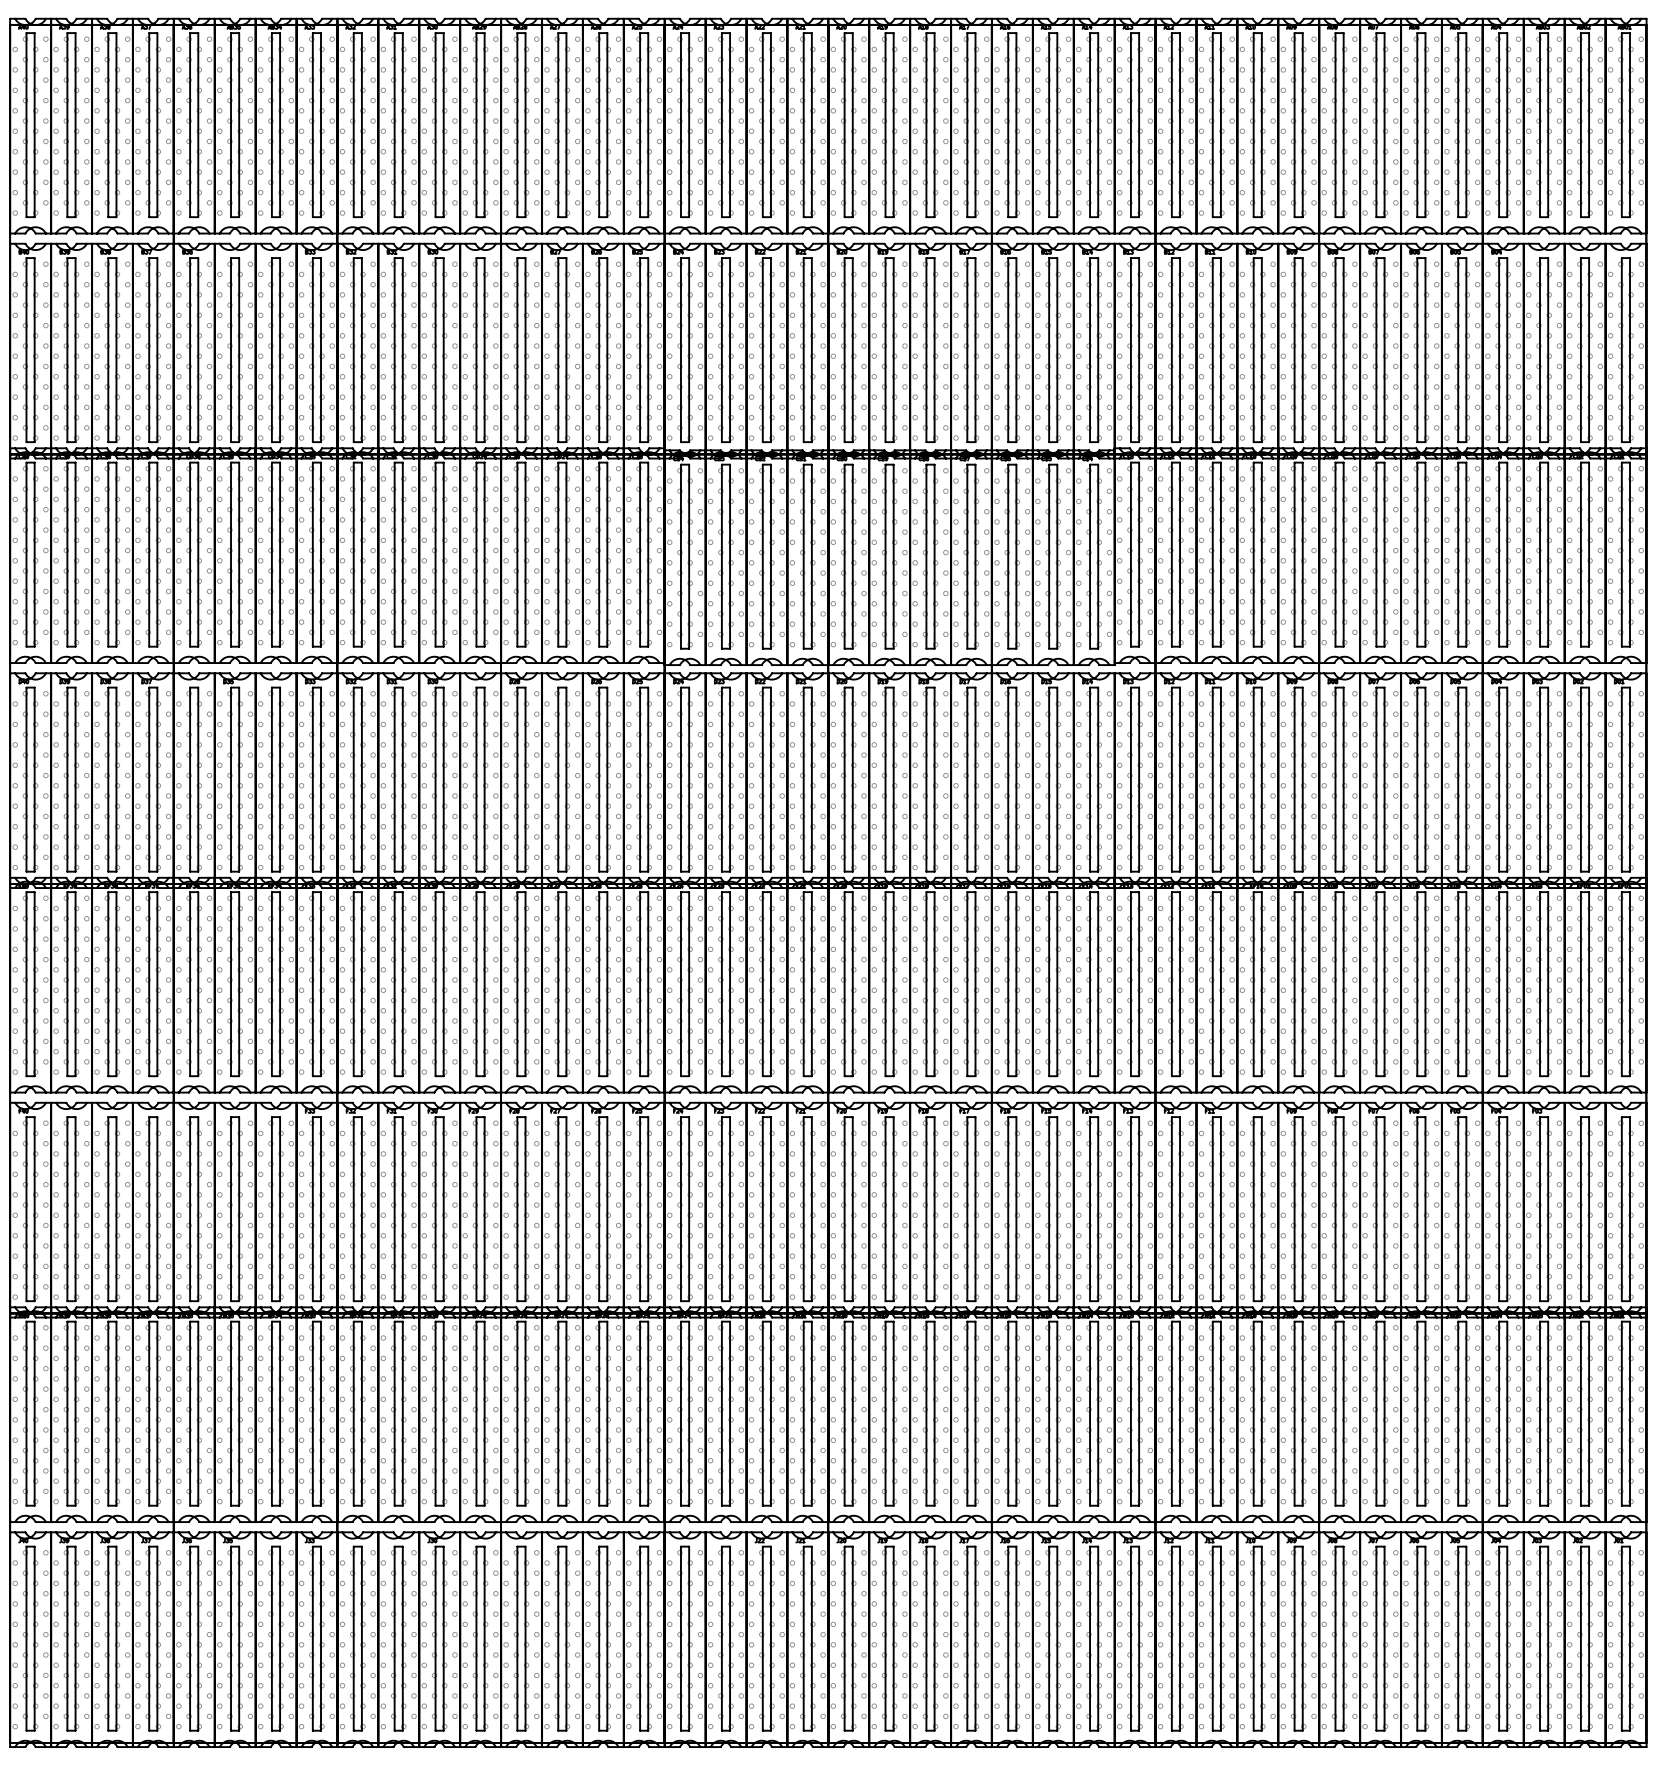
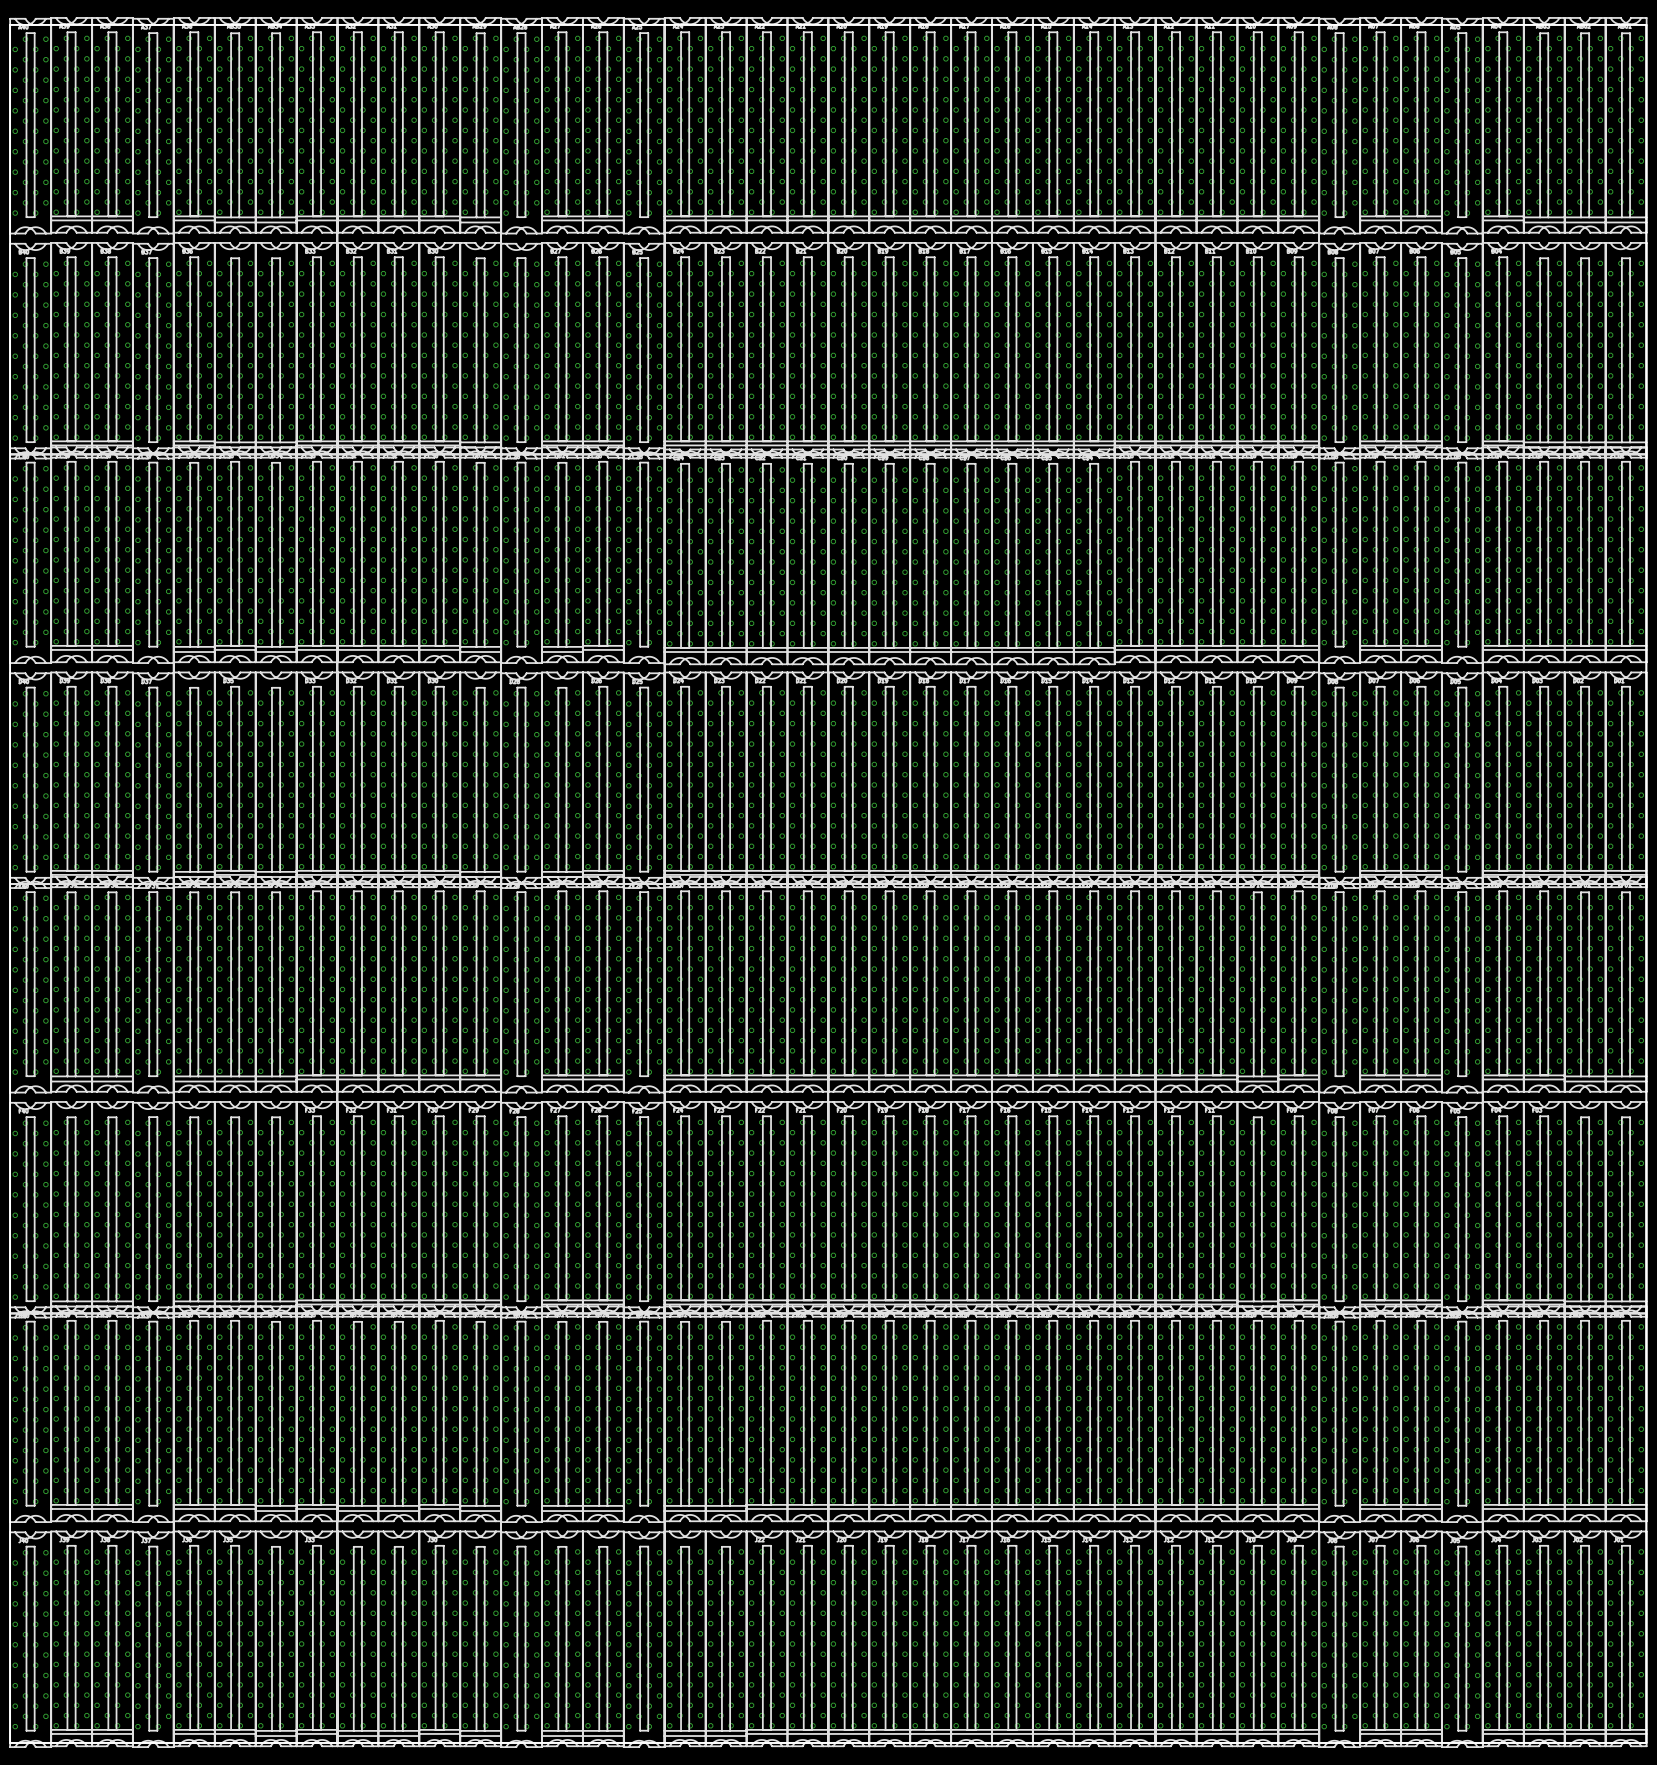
part footprint: [50, 18, 93, 234] -> [50, 17, 93, 233]
part footprint: [91, 18, 134, 234] -> [91, 17, 134, 233]
part footprint: [173, 18, 216, 234] -> [173, 17, 216, 233]
part footprint: [214, 18, 256, 459] -> [214, 17, 257, 458]
part footprint: [255, 18, 297, 459] -> [255, 17, 298, 458]
part footprint: [296, 18, 338, 234] -> [296, 17, 338, 233]
part footprint: [337, 18, 379, 234] -> [336, 17, 379, 233]
part footprint: [378, 18, 420, 234] -> [377, 17, 420, 233]
part footprint: [418, 18, 461, 234] -> [418, 17, 461, 233]
part footprint: [459, 18, 502, 459] -> [459, 17, 502, 458]
part footprint: [541, 18, 584, 234] -> [541, 17, 584, 233]
part footprint: [582, 18, 625, 234] -> [582, 17, 625, 233]
part footprint: [664, 18, 706, 234] -> [664, 17, 707, 233]
part footprint: [705, 18, 747, 234] -> [705, 17, 747, 233]
part footprint: [746, 18, 788, 234] -> [745, 17, 788, 233]
part footprint: [787, 18, 829, 234] -> [786, 17, 829, 233]
part footprint: [828, 18, 870, 234] -> [827, 17, 870, 233]
part footprint: [868, 18, 911, 234] -> [868, 17, 911, 233]
part footprint: [909, 18, 952, 234] -> [909, 17, 952, 233]
part footprint: [950, 18, 993, 234] -> [950, 17, 993, 233]
part footprint: [991, 18, 1034, 234] -> [991, 17, 1034, 233]
part footprint: [1032, 18, 1075, 234] -> [1032, 17, 1075, 233]
part footprint: [1073, 18, 1115, 234] -> [1073, 17, 1116, 233]
part footprint: [1114, 18, 1156, 234] -> [1114, 17, 1157, 233]
part footprint: [1155, 18, 1197, 234] -> [1155, 17, 1197, 233]
part footprint: [1196, 18, 1238, 234] -> [1195, 17, 1238, 233]
part footprint: [1237, 18, 1279, 234] -> [1236, 17, 1279, 233]
part footprint: [1278, 18, 1320, 234] -> [1277, 17, 1320, 233]
part footprint: [1359, 18, 1402, 234] -> [1359, 17, 1402, 233]
part footprint: [1400, 18, 1443, 234] -> [1400, 17, 1443, 233]
part footprint: [1482, 18, 1525, 234] -> [1482, 17, 1525, 233]
part footprint: [1523, 18, 1565, 459] -> [1523, 17, 1566, 458]
part footprint: [1564, 18, 1606, 459] -> [1564, 17, 1607, 458]
part footprint: [1605, 18, 1647, 459] -> [1605, 17, 1647, 458]
part footprint: [50, 243, 93, 459] -> [50, 242, 93, 458]
part footprint: [91, 243, 134, 459] -> [91, 242, 134, 458]
part footprint: [173, 243, 216, 459] -> [173, 242, 216, 458]
part footprint: [296, 243, 338, 459] -> [296, 242, 338, 458]
part footprint: [337, 243, 379, 459] -> [336, 242, 379, 458]
part footprint: [378, 243, 420, 459] -> [377, 242, 420, 458]
part footprint: [418, 243, 461, 459] -> [418, 242, 461, 458]
part footprint: [541, 243, 584, 459] -> [541, 242, 584, 458]
part footprint: [582, 243, 625, 459] -> [582, 242, 625, 458]
part footprint: [664, 243, 706, 459] -> [664, 242, 707, 458]
part footprint: [705, 243, 747, 459] -> [705, 242, 747, 458]
part footprint: [746, 243, 788, 459] -> [745, 242, 788, 458]
part footprint: [787, 243, 829, 459] -> [786, 242, 829, 458]
part footprint: [828, 243, 870, 459] -> [827, 242, 870, 458]
part footprint: [868, 243, 911, 459] -> [868, 242, 911, 458]
part footprint: [909, 243, 952, 459] -> [909, 242, 952, 458]
part footprint: [950, 243, 993, 459] -> [950, 242, 993, 458]
part footprint: [991, 243, 1034, 459] -> [991, 242, 1034, 458]
part footprint: [1032, 243, 1075, 459] -> [1032, 242, 1075, 458]
part footprint: [1073, 243, 1115, 459] -> [1073, 242, 1116, 458]
part footprint: [1114, 243, 1156, 459] -> [1114, 242, 1157, 458]
part footprint: [1155, 243, 1197, 459] -> [1155, 242, 1197, 458]
part footprint: [1196, 243, 1238, 459] -> [1195, 242, 1238, 458]
part footprint: [1237, 243, 1279, 459] -> [1236, 242, 1279, 458]
part footprint: [1278, 243, 1320, 459] -> [1277, 242, 1320, 458]
part footprint: [1359, 243, 1402, 459] -> [1359, 242, 1402, 458]
part footprint: [1400, 243, 1443, 459] -> [1400, 242, 1443, 458]
part footprint: [1482, 243, 1525, 459] -> [1482, 242, 1525, 458]
part footprint: [50, 448, 93, 664] -> [50, 447, 93, 663]
part footprint: [91, 448, 134, 664] -> [91, 447, 134, 663]
part footprint: [173, 448, 216, 889] -> [173, 447, 216, 888]
part footprint: [214, 448, 256, 664] -> [214, 447, 257, 663]
part footprint: [255, 448, 297, 889] -> [255, 447, 298, 888]
part footprint: [296, 448, 338, 664] -> [296, 447, 338, 663]
part footprint: [337, 448, 379, 664] -> [336, 447, 379, 663]
part footprint: [378, 448, 420, 664] -> [377, 447, 420, 663]
part footprint: [418, 448, 461, 664] -> [418, 447, 461, 663]
part footprint: [459, 448, 502, 889] -> [459, 447, 502, 888]
part footprint: [541, 448, 584, 889] -> [541, 447, 584, 888]
part footprint: [582, 448, 625, 664] -> [582, 447, 625, 663]
part footprint: [1114, 448, 1156, 664] -> [1114, 447, 1157, 663]
part footprint: [1155, 448, 1197, 664] -> [1155, 447, 1197, 663]
part footprint: [1196, 448, 1238, 664] -> [1195, 447, 1238, 663]
part footprint: [1237, 448, 1279, 664] -> [1236, 447, 1279, 663]
part footprint: [1278, 448, 1320, 664] -> [1277, 447, 1320, 663]
part footprint: [1359, 448, 1402, 664] -> [1359, 447, 1402, 663]
part footprint: [1400, 448, 1443, 664] -> [1400, 447, 1443, 663]
part footprint: [1482, 448, 1525, 664] -> [1482, 447, 1525, 663]
part footprint: [1523, 448, 1565, 664] -> [1523, 447, 1566, 663]
part footprint: [1564, 448, 1606, 664] -> [1564, 447, 1607, 663]
part footprint: [1605, 448, 1647, 664] -> [1605, 447, 1647, 663]
part footprint: [664, 450, 706, 666] -> [664, 449, 707, 665]
part footprint: [705, 450, 747, 666] -> [705, 449, 747, 665]
part footprint: [746, 450, 788, 666] -> [745, 449, 788, 665]
part footprint: [787, 450, 829, 666] -> [786, 449, 829, 665]
part footprint: [828, 450, 870, 666] -> [827, 449, 870, 665]
part footprint: [868, 450, 911, 666] -> [868, 449, 911, 665]
part footprint: [909, 450, 952, 666] -> [909, 449, 952, 665]
part footprint: [950, 450, 993, 666] -> [950, 449, 993, 665]
part footprint: [991, 450, 1034, 666] -> [991, 449, 1034, 665]
part footprint: [1032, 450, 1075, 666] -> [1032, 449, 1075, 665]
part footprint: [1073, 450, 1115, 666] -> [1073, 449, 1116, 665]
part footprint: [50, 673, 93, 889] -> [50, 672, 93, 888]
part footprint: [91, 673, 134, 889] -> [91, 672, 134, 888]
part footprint: [214, 673, 256, 889] -> [214, 672, 257, 888]
part footprint: [296, 673, 338, 889] -> [296, 672, 338, 888]
part footprint: [337, 673, 379, 889] -> [336, 672, 379, 888]
part footprint: [378, 673, 420, 889] -> [377, 672, 420, 888]
part footprint: [418, 673, 461, 889] -> [418, 672, 461, 888]
part footprint: [582, 673, 625, 889] -> [582, 672, 625, 888]
part footprint: [664, 673, 706, 889] -> [664, 672, 707, 888]
part footprint: [705, 673, 747, 889] -> [705, 672, 747, 888]
part footprint: [746, 673, 788, 889] -> [745, 672, 788, 888]
part footprint: [787, 673, 829, 889] -> [786, 672, 829, 888]
part footprint: [828, 673, 870, 889] -> [827, 672, 870, 888]
part footprint: [868, 673, 911, 889] -> [868, 672, 911, 888]
part footprint: [909, 673, 952, 889] -> [909, 672, 952, 888]
part footprint: [950, 673, 993, 889] -> [950, 672, 993, 888]
part footprint: [991, 673, 1034, 889] -> [991, 672, 1034, 888]
part footprint: [1032, 673, 1075, 889] -> [1032, 672, 1075, 888]
part footprint: [1073, 673, 1115, 889] -> [1073, 672, 1116, 888]
part footprint: [1114, 673, 1156, 889] -> [1114, 672, 1157, 888]
part footprint: [1155, 673, 1197, 889] -> [1155, 672, 1197, 888]
part footprint: [1196, 673, 1238, 889] -> [1195, 672, 1238, 888]
part footprint: [1237, 673, 1279, 889] -> [1236, 672, 1279, 888]
part footprint: [1278, 673, 1320, 889] -> [1277, 672, 1320, 888]
part footprint: [1359, 673, 1402, 889] -> [1359, 672, 1402, 888]
part footprint: [1400, 673, 1443, 889] -> [1400, 672, 1443, 888]
part footprint: [1482, 673, 1525, 889] -> [1482, 672, 1525, 888]
part footprint: [1523, 673, 1565, 889] -> [1523, 672, 1566, 888]
part footprint: [1564, 673, 1606, 889] -> [1564, 672, 1607, 888]
part footprint: [1605, 673, 1647, 889] -> [1605, 672, 1647, 888]
part footprint: [50, 877, 93, 1318] -> [50, 876, 93, 1317]
part footprint: [91, 877, 134, 1318] -> [91, 876, 134, 1317]
part footprint: [173, 877, 216, 1318] -> [173, 876, 216, 1317]
part footprint: [214, 877, 256, 1318] -> [214, 876, 257, 1317]
part footprint: [255, 877, 297, 1318] -> [255, 876, 298, 1317]
part footprint: [296, 877, 338, 1093] -> [296, 876, 338, 1092]
part footprint: [337, 877, 379, 1093] -> [336, 876, 379, 1092]
part footprint: [378, 877, 420, 1093] -> [377, 876, 420, 1092]
part footprint: [418, 877, 461, 1093] -> [418, 876, 461, 1092]
part footprint: [459, 877, 502, 1093] -> [459, 876, 502, 1092]
part footprint: [541, 877, 584, 1093] -> [541, 876, 584, 1092]
part footprint: [582, 877, 625, 1093] -> [582, 876, 625, 1092]
part footprint: [664, 877, 706, 1093] -> [664, 876, 707, 1092]
part footprint: [705, 877, 747, 1093] -> [705, 876, 747, 1092]
part footprint: [746, 877, 788, 1093] -> [745, 876, 788, 1092]
part footprint: [787, 877, 829, 1093] -> [786, 876, 829, 1092]
part footprint: [828, 877, 870, 1093] -> [827, 876, 870, 1092]
part footprint: [868, 877, 911, 1093] -> [868, 876, 911, 1092]
part footprint: [909, 877, 952, 1093] -> [909, 876, 952, 1092]
part footprint: [950, 877, 993, 1093] -> [950, 876, 993, 1092]
part footprint: [991, 877, 1034, 1093] -> [991, 876, 1034, 1092]
part footprint: [1032, 877, 1075, 1093] -> [1032, 876, 1075, 1092]
part footprint: [1073, 877, 1115, 1093] -> [1073, 876, 1116, 1092]
part footprint: [1114, 877, 1156, 1093] -> [1114, 876, 1157, 1092]
part footprint: [1155, 877, 1197, 1093] -> [1155, 876, 1197, 1092]
part footprint: [1196, 877, 1238, 1093] -> [1195, 876, 1238, 1092]
part footprint: [1237, 877, 1279, 1318] -> [1236, 876, 1279, 1317]
part footprint: [1278, 877, 1320, 1093] -> [1277, 876, 1320, 1092]
part footprint: [1359, 877, 1402, 1093] -> [1359, 876, 1402, 1092]
part footprint: [1400, 877, 1443, 1093] -> [1400, 876, 1443, 1092]
part footprint: [1482, 877, 1525, 1093] -> [1482, 876, 1525, 1092]
part footprint: [1523, 877, 1565, 1093] -> [1523, 876, 1566, 1092]
part footprint: [1564, 877, 1606, 1318] -> [1564, 876, 1607, 1317]
part footprint: [1605, 877, 1647, 1318] -> [1605, 876, 1647, 1317]
part footprint: [296, 1102, 338, 1318] -> [296, 1101, 338, 1317]
part footprint: [337, 1102, 379, 1318] -> [336, 1101, 379, 1317]
part footprint: [378, 1102, 420, 1318] -> [377, 1101, 420, 1317]
part footprint: [418, 1102, 461, 1318] -> [418, 1101, 461, 1317]
part footprint: [459, 1102, 502, 1318] -> [459, 1101, 502, 1317]
part footprint: [541, 1102, 584, 1318] -> [541, 1101, 584, 1317]
part footprint: [582, 1102, 625, 1318] -> [582, 1101, 625, 1317]
part footprint: [664, 1102, 706, 1318] -> [664, 1101, 707, 1317]
part footprint: [705, 1102, 747, 1318] -> [705, 1101, 747, 1317]
part footprint: [746, 1102, 788, 1318] -> [745, 1101, 788, 1317]
part footprint: [787, 1102, 829, 1318] -> [786, 1101, 829, 1317]
part footprint: [828, 1102, 870, 1318] -> [827, 1101, 870, 1317]
part footprint: [868, 1102, 911, 1318] -> [868, 1101, 911, 1317]
part footprint: [909, 1102, 952, 1318] -> [909, 1101, 952, 1317]
part footprint: [950, 1102, 993, 1318] -> [950, 1101, 993, 1317]
part footprint: [991, 1102, 1034, 1318] -> [991, 1101, 1034, 1317]
part footprint: [1032, 1102, 1075, 1318] -> [1032, 1101, 1075, 1317]
part footprint: [1073, 1102, 1115, 1318] -> [1073, 1101, 1116, 1317]
part footprint: [1114, 1102, 1156, 1318] -> [1114, 1101, 1157, 1317]
part footprint: [1155, 1102, 1197, 1318] -> [1155, 1101, 1197, 1317]
part footprint: [1196, 1102, 1238, 1318] -> [1195, 1101, 1238, 1317]
part footprint: [1278, 1102, 1320, 1318] -> [1277, 1101, 1320, 1317]
part footprint: [1359, 1102, 1402, 1318] -> [1359, 1101, 1402, 1317]
part footprint: [1400, 1102, 1443, 1318] -> [1400, 1101, 1443, 1317]
part footprint: [1482, 1102, 1525, 1318] -> [1482, 1101, 1525, 1317]
part footprint: [1523, 1102, 1565, 1318] -> [1523, 1101, 1566, 1317]
part footprint: [50, 1307, 93, 1523] -> [50, 1306, 93, 1522]
part footprint: [91, 1307, 134, 1523] -> [91, 1306, 134, 1522]
part footprint: [173, 1307, 216, 1523] -> [173, 1306, 216, 1522]
part footprint: [214, 1307, 256, 1523] -> [214, 1306, 257, 1522]
part footprint: [255, 1307, 297, 1748] -> [255, 1306, 298, 1747]
part footprint: [296, 1307, 338, 1523] -> [296, 1306, 338, 1522]
part footprint: [337, 1307, 379, 1748] -> [336, 1306, 379, 1747]
part footprint: [378, 1307, 420, 1748] -> [377, 1306, 420, 1747]
part footprint: [418, 1307, 461, 1523] -> [418, 1306, 461, 1522]
part footprint: [459, 1307, 502, 1748] -> [459, 1306, 502, 1747]
part footprint: [541, 1307, 584, 1748] -> [541, 1306, 584, 1747]
part footprint: [582, 1307, 625, 1748] -> [582, 1306, 625, 1747]
part footprint: [664, 1307, 706, 1748] -> [664, 1306, 707, 1747]
part footprint: [705, 1307, 747, 1748] -> [705, 1306, 747, 1747]
part footprint: [746, 1307, 788, 1523] -> [745, 1306, 788, 1522]
part footprint: [787, 1307, 829, 1523] -> [786, 1306, 829, 1522]
part footprint: [828, 1307, 870, 1523] -> [827, 1306, 870, 1522]
part footprint: [868, 1307, 911, 1523] -> [868, 1306, 911, 1522]
part footprint: [909, 1307, 952, 1523] -> [909, 1306, 952, 1522]
part footprint: [950, 1307, 993, 1523] -> [950, 1306, 993, 1522]
part footprint: [991, 1307, 1034, 1523] -> [991, 1306, 1034, 1522]
part footprint: [1032, 1307, 1075, 1523] -> [1032, 1306, 1075, 1522]
part footprint: [1073, 1307, 1115, 1523] -> [1073, 1306, 1116, 1522]
part footprint: [1114, 1307, 1156, 1523] -> [1114, 1306, 1157, 1522]
part footprint: [1155, 1307, 1197, 1523] -> [1155, 1306, 1197, 1522]
part footprint: [1196, 1307, 1238, 1523] -> [1195, 1306, 1238, 1522]
part footprint: [1237, 1307, 1279, 1523] -> [1236, 1306, 1279, 1522]
part footprint: [1278, 1307, 1320, 1523] -> [1277, 1306, 1320, 1522]
part footprint: [1359, 1307, 1402, 1523] -> [1359, 1306, 1402, 1522]
part footprint: [1400, 1307, 1443, 1523] -> [1400, 1306, 1443, 1522]
part footprint: [1482, 1307, 1525, 1523] -> [1482, 1306, 1525, 1522]
part footprint: [1523, 1307, 1565, 1523] -> [1523, 1306, 1566, 1522]
part footprint: [1564, 1307, 1606, 1523] -> [1564, 1306, 1607, 1522]
part footprint: [1605, 1307, 1647, 1523] -> [1605, 1306, 1647, 1522]
part footprint: [50, 1532, 93, 1748] -> [50, 1531, 93, 1747]
part footprint: [91, 1532, 134, 1748] -> [91, 1531, 134, 1747]
part footprint: [173, 1532, 216, 1748] -> [173, 1531, 216, 1747]
part footprint: [214, 1532, 256, 1748] -> [214, 1531, 257, 1747]
part footprint: [296, 1532, 338, 1748] -> [296, 1531, 338, 1747]
part footprint: [418, 1532, 461, 1748] -> [418, 1531, 461, 1747]
part footprint: [746, 1532, 788, 1748] -> [745, 1531, 788, 1747]
part footprint: [787, 1532, 829, 1748] -> [786, 1531, 829, 1747]
part footprint: [828, 1532, 870, 1748] -> [827, 1531, 870, 1747]
part footprint: [868, 1532, 911, 1748] -> [868, 1531, 911, 1747]
part footprint: [909, 1532, 952, 1748] -> [909, 1531, 952, 1747]
part footprint: [950, 1532, 993, 1748] -> [950, 1531, 993, 1747]
part footprint: [991, 1532, 1034, 1748] -> [991, 1531, 1034, 1747]
part footprint: [1032, 1532, 1075, 1748] -> [1032, 1531, 1075, 1747]
part footprint: [1073, 1532, 1115, 1748] -> [1073, 1531, 1116, 1747]
part footprint: [1114, 1532, 1156, 1748] -> [1114, 1531, 1157, 1747]
part footprint: [1155, 1532, 1197, 1748] -> [1155, 1531, 1197, 1747]
part footprint: [1196, 1532, 1238, 1748] -> [1195, 1531, 1238, 1747]
part footprint: [1237, 1532, 1279, 1748] -> [1236, 1531, 1279, 1747]
part footprint: [1278, 1532, 1320, 1748] -> [1277, 1531, 1320, 1747]
part footprint: [1359, 1532, 1402, 1748] -> [1359, 1531, 1402, 1747]
part footprint: [1400, 1532, 1443, 1748] -> [1400, 1531, 1443, 1747]
part footprint: [1482, 1532, 1525, 1748] -> [1482, 1531, 1525, 1747]
part footprint: [1523, 1532, 1565, 1748] -> [1523, 1531, 1566, 1747]
part footprint: [1564, 1532, 1606, 1748] -> [1564, 1531, 1607, 1747]
part footprint: [1605, 1532, 1647, 1748] -> [1605, 1531, 1647, 1747]

